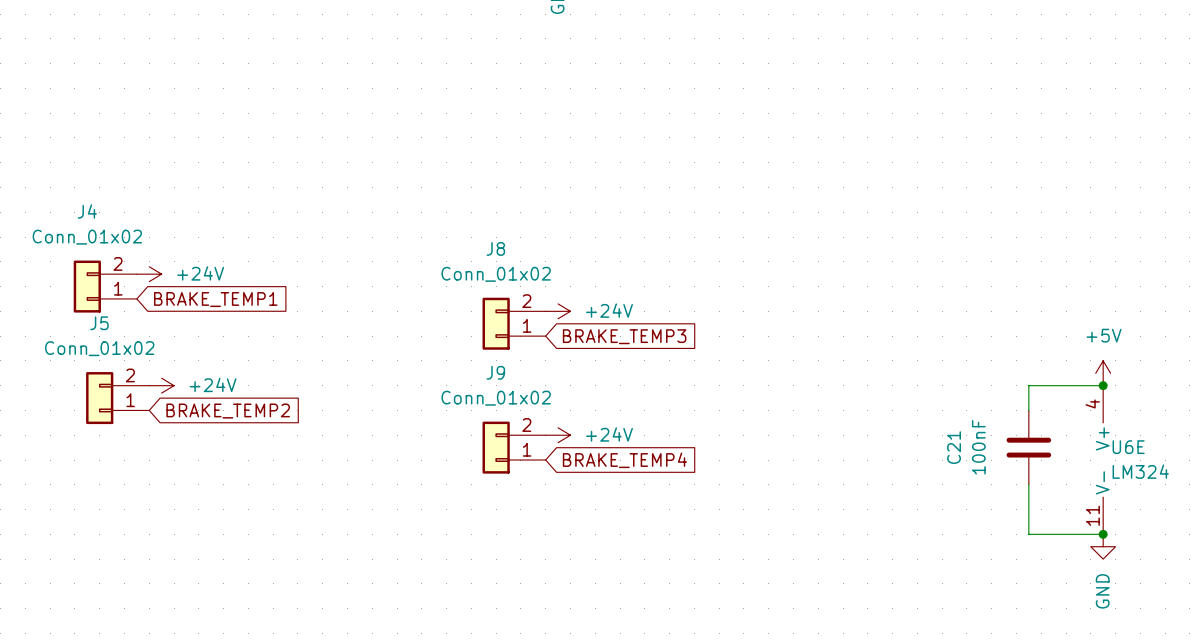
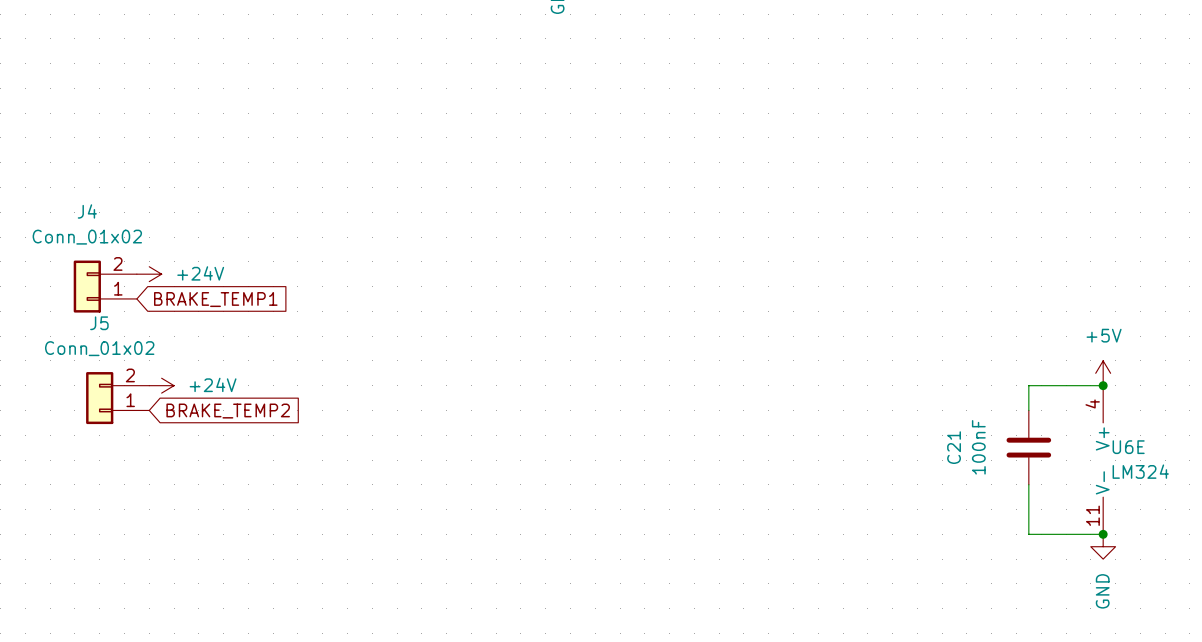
power symbol: +24V (558, 311) -> none
J8: Conn_01x02 (514, 323) -> none
global label: BRAKE_TEMP3 (624, 336) -> none
power symbol: +24V (558, 435) -> none
J9: Conn_01x02 (514, 447) -> none
global label: BRAKE_TEMP4 (624, 460) -> none

